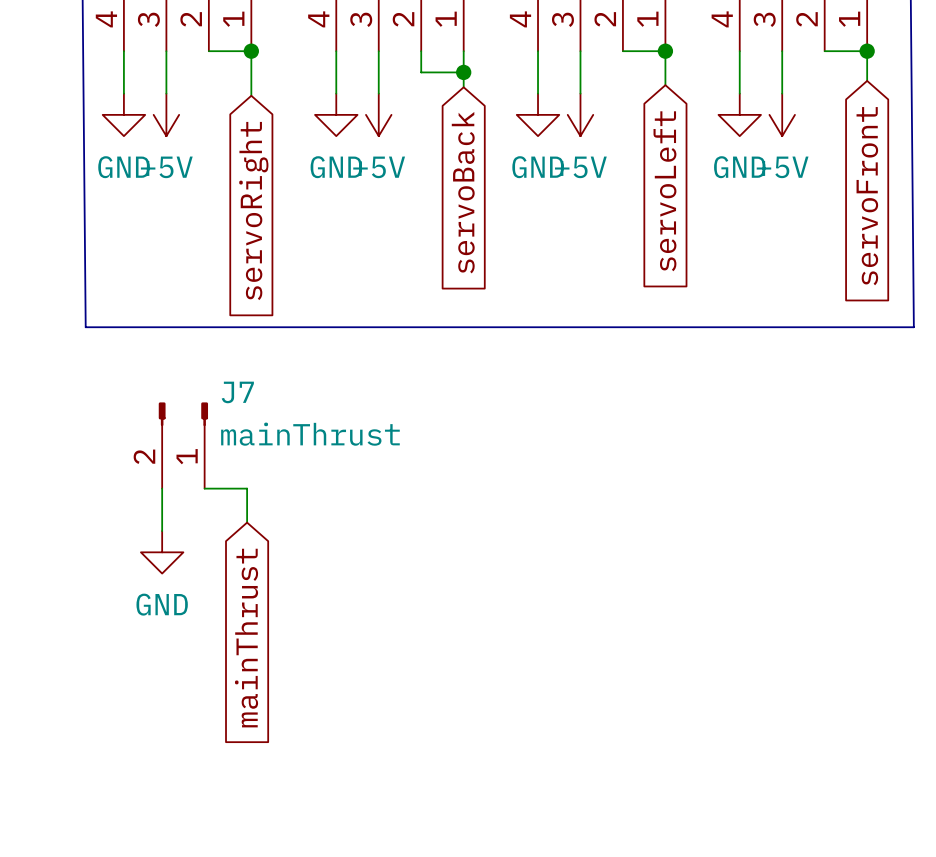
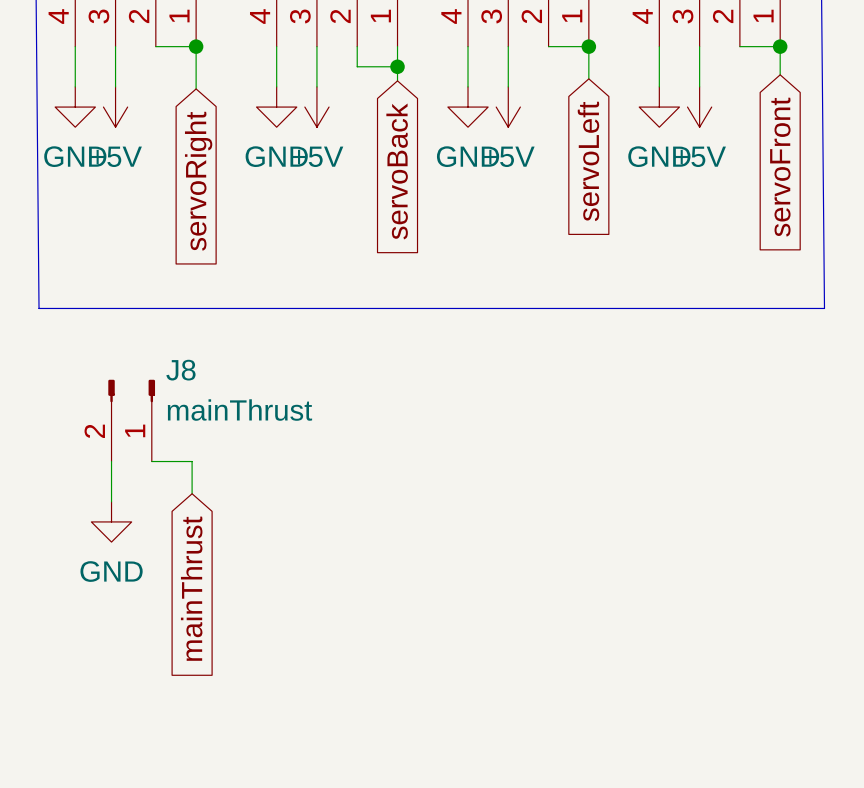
J7 name: J7 (237, 392) -> J8 (180, 370)

